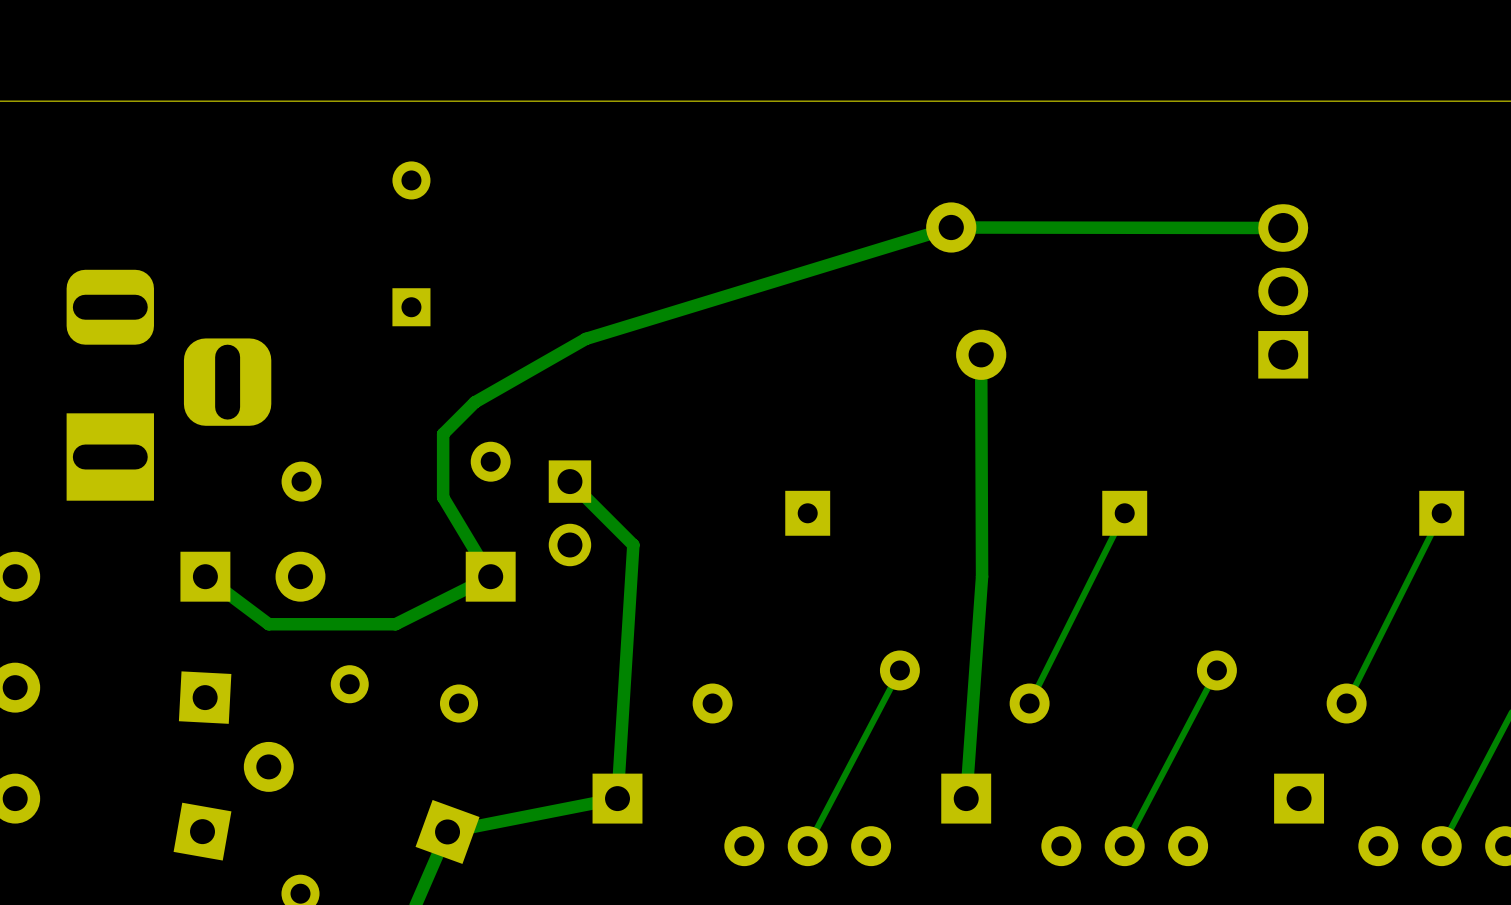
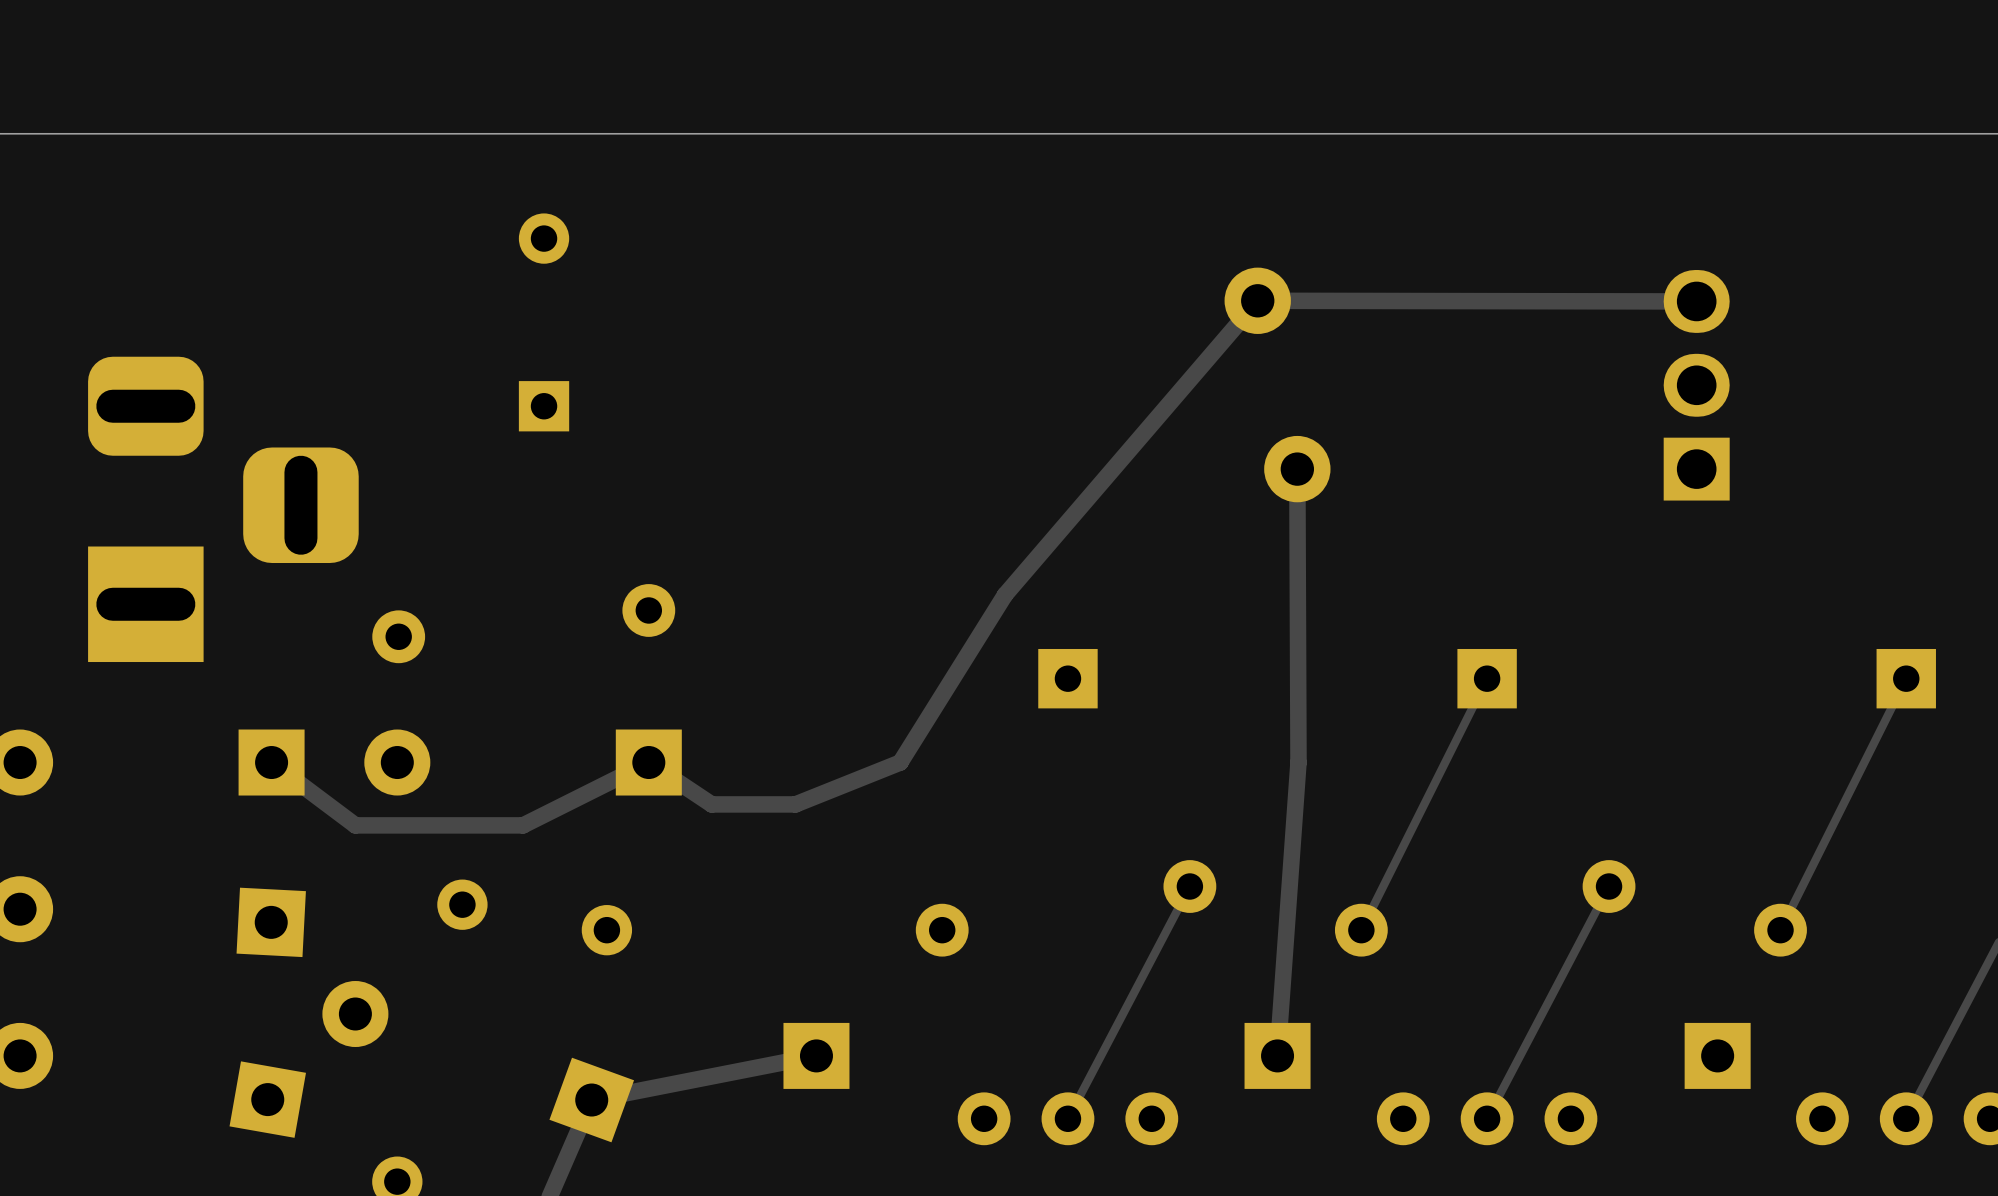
track: (951, 227) (585, 338) (474, 402) (443, 434) (443, 497) (490, 576) -> (1257, 300) (1005, 594) (900, 762) (795, 804) (711, 804) (648, 762)
track: (569, 481) (633, 544) (617, 798) -> none
part: (569, 513) -> none

